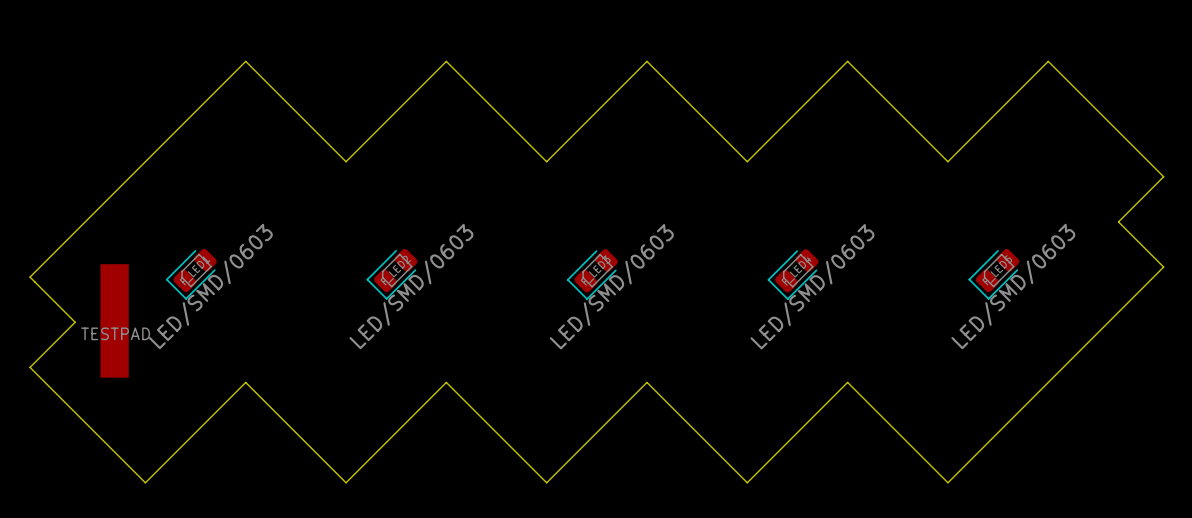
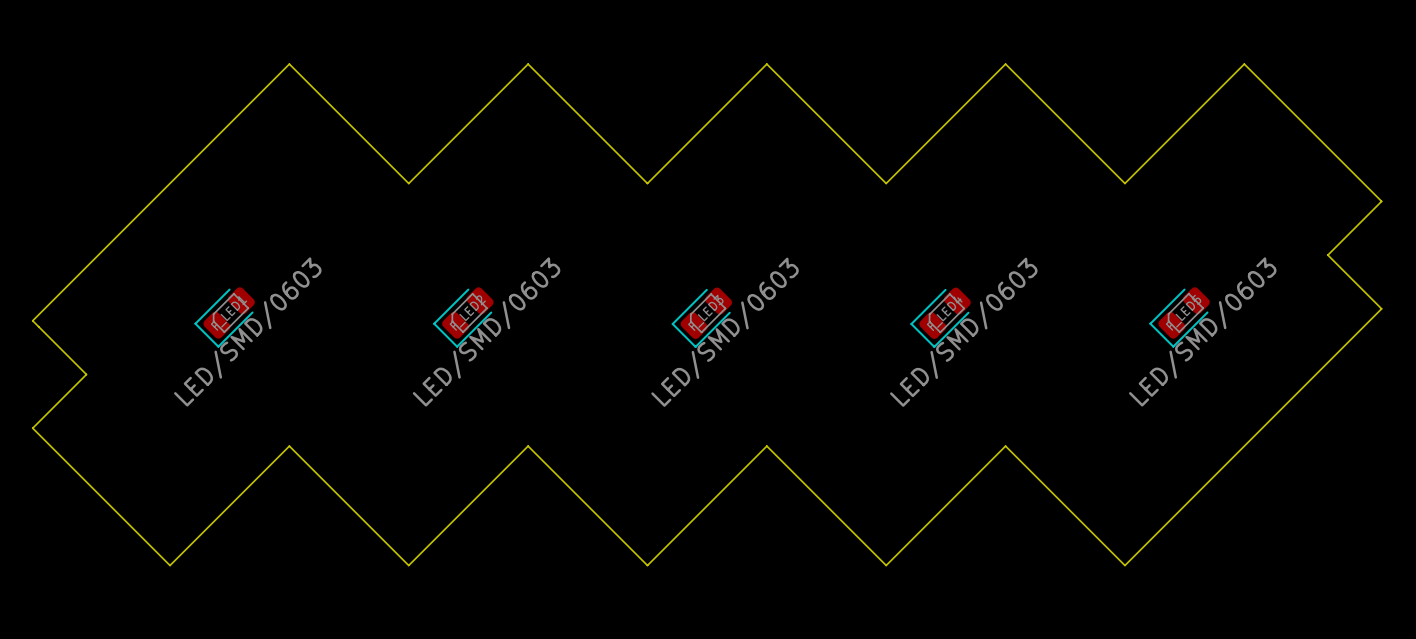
part: TESTPAD (114, 320) -> none

